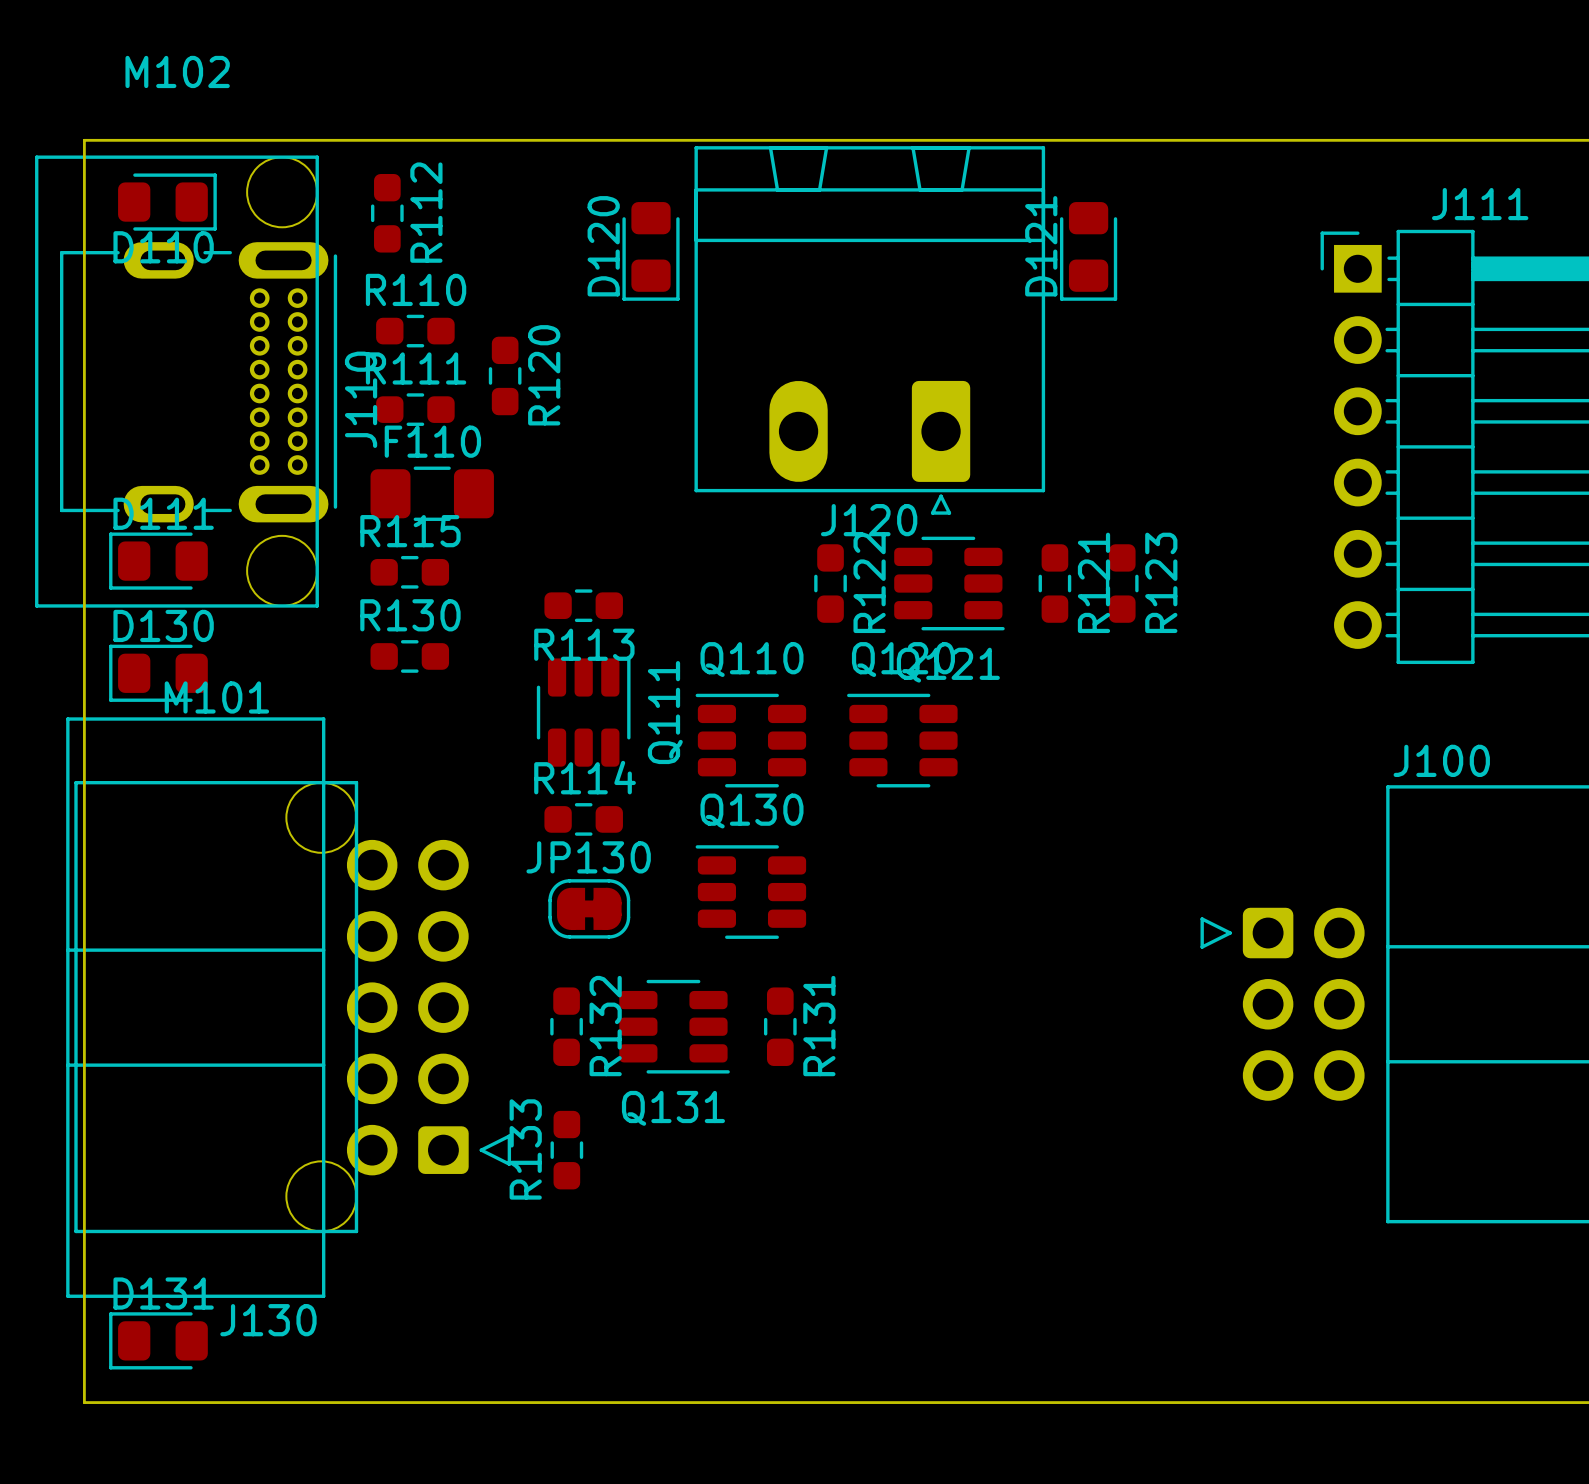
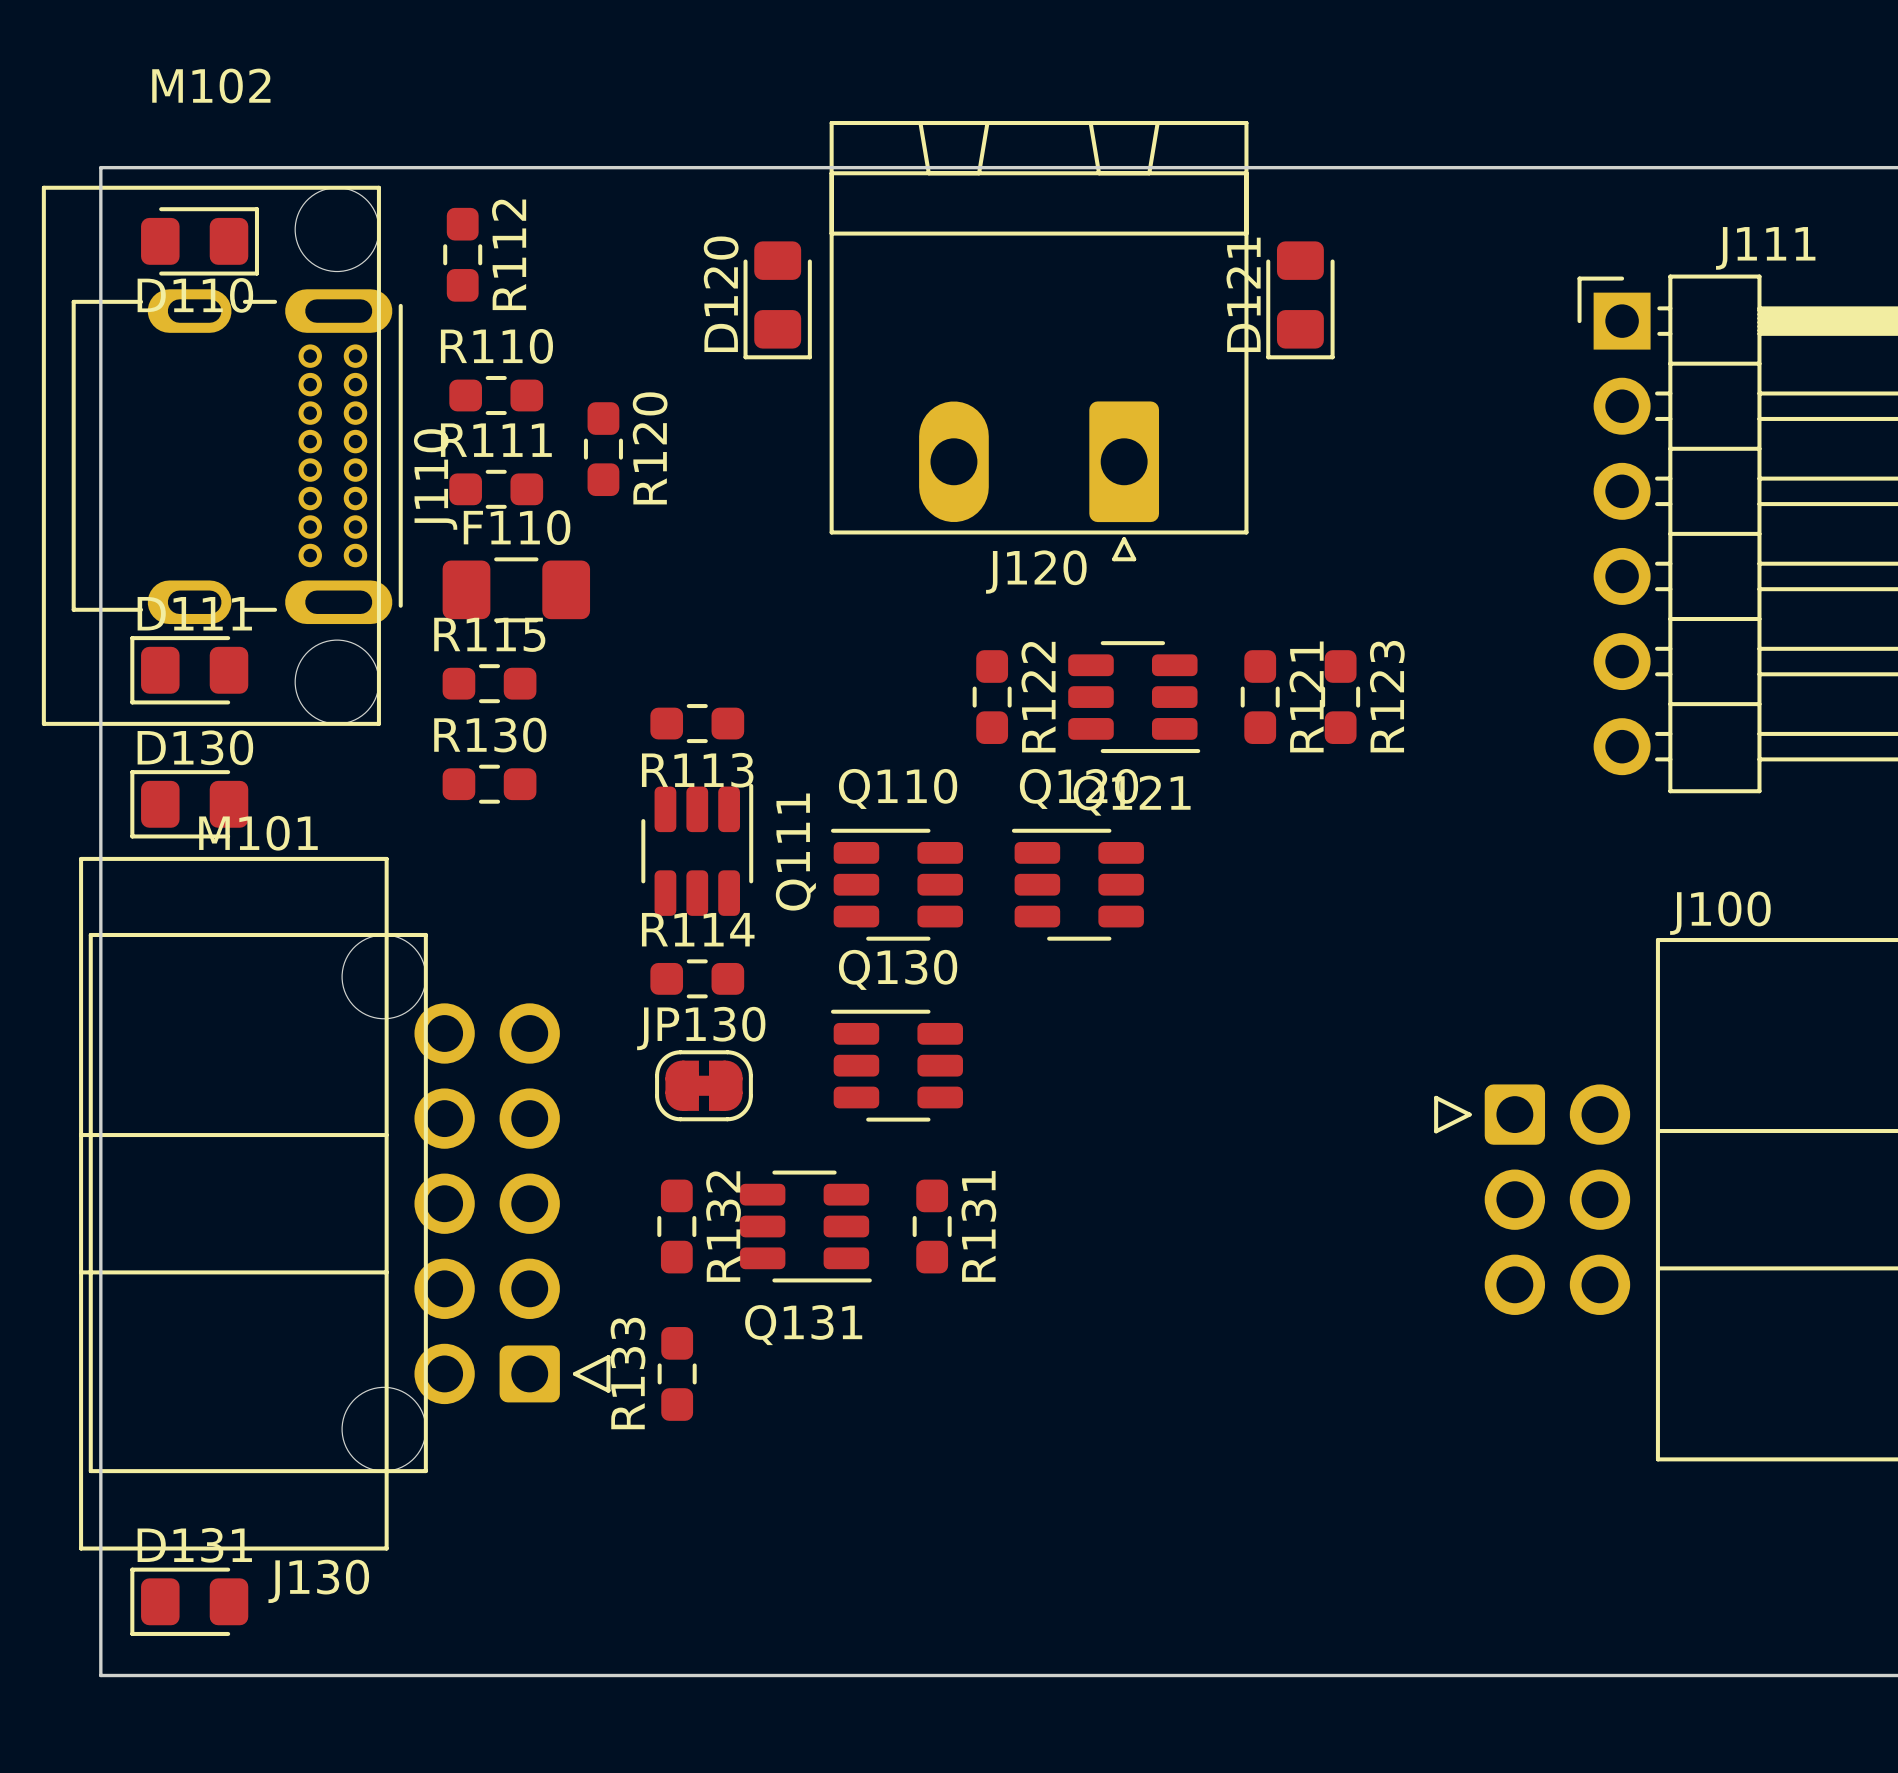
J120 position: (869, 330) -> (1039, 341)

